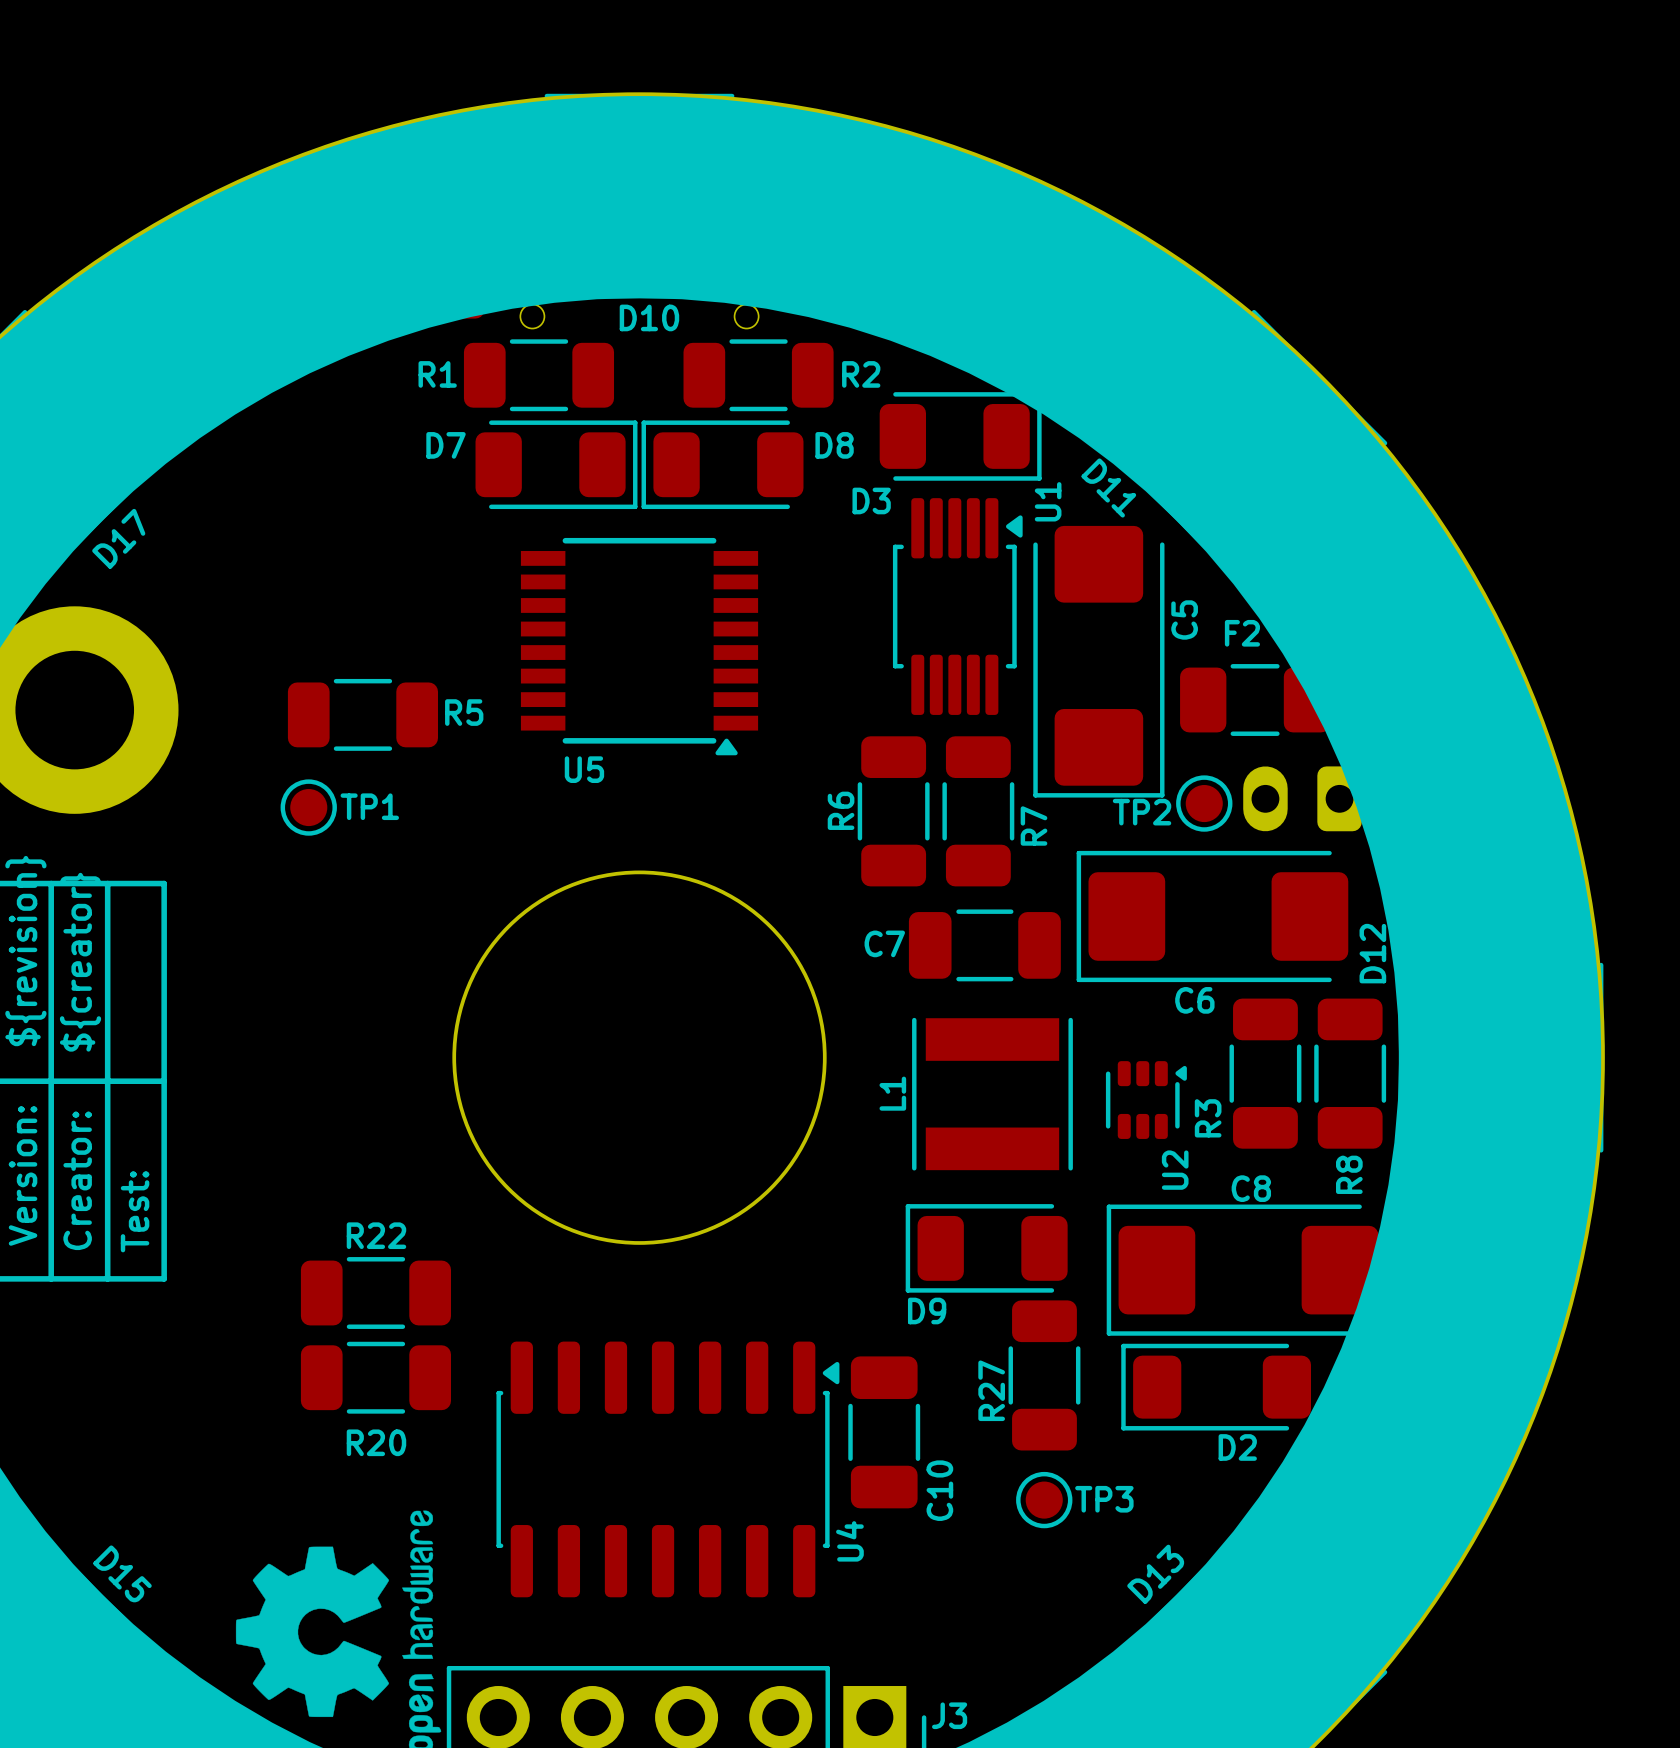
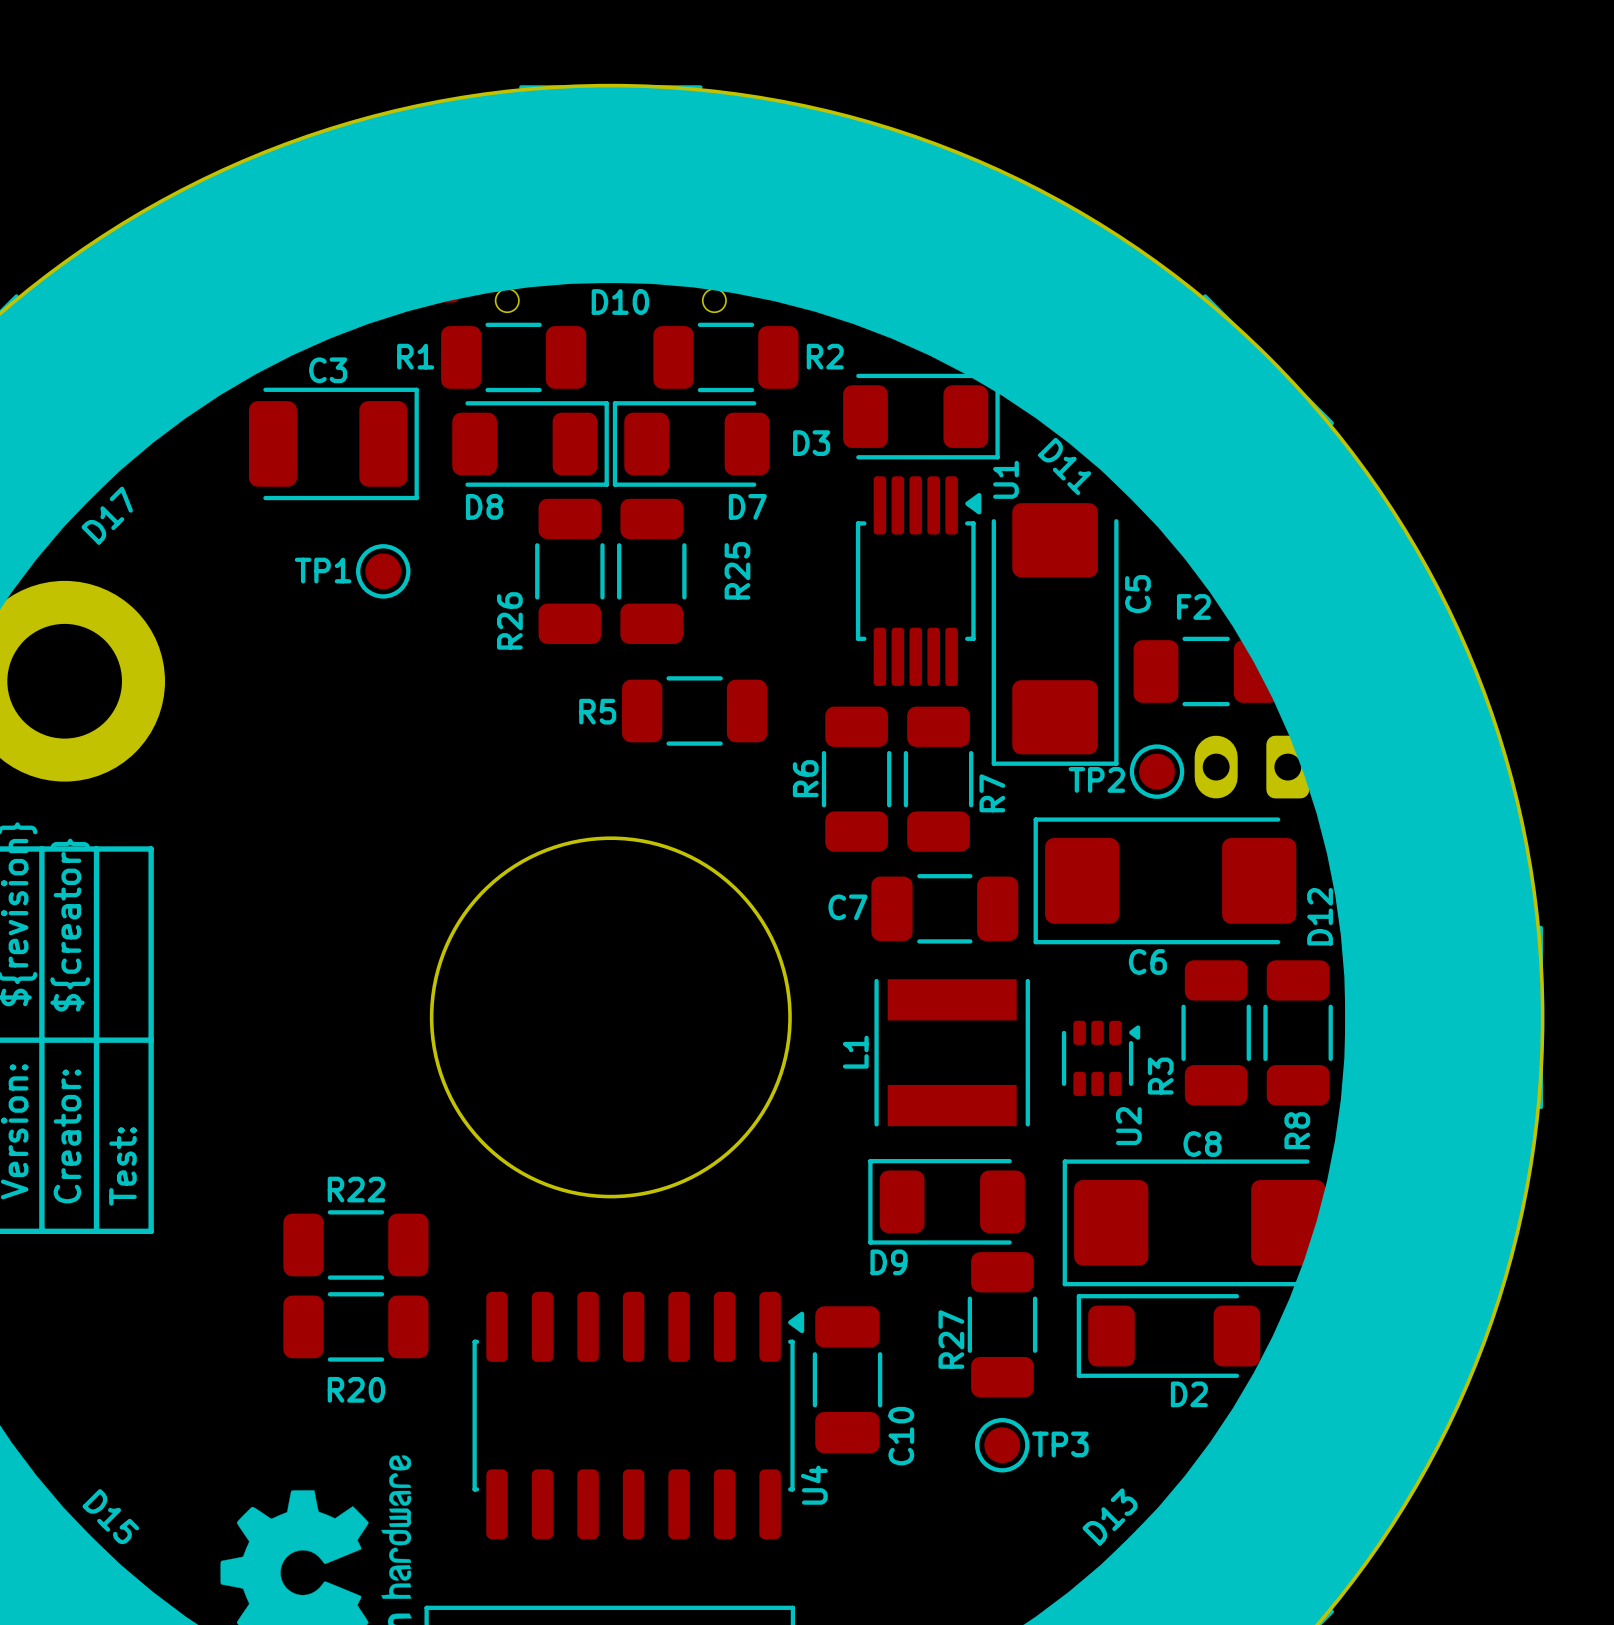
D7 name: D7 (446, 445) -> D8 (484, 506)
D8 name: D8 (834, 445) -> D7 (747, 506)
C3: none -> (333, 443)
D3 name position: D3 (871, 500) -> D3 (811, 443)
R26: none -> (569, 571)
R25: none -> (651, 571)
U5: (639, 646) -> none
R5 name position: R5 (464, 712) -> R5 (597, 711)
R5 position: (362, 714) -> (694, 710)
TP1 name position: TP1 (369, 806) -> TP1 (323, 570)
TP1 position: (308, 807) -> (383, 571)

